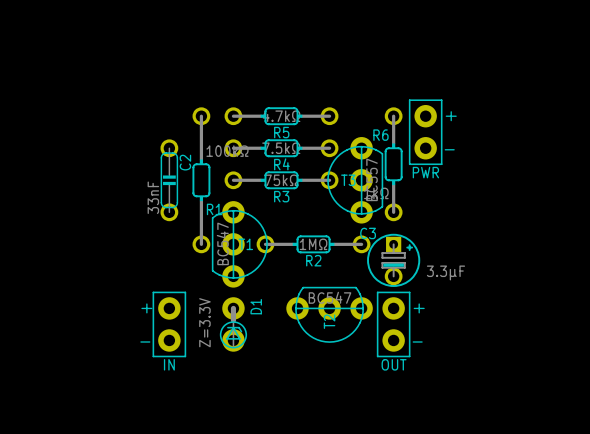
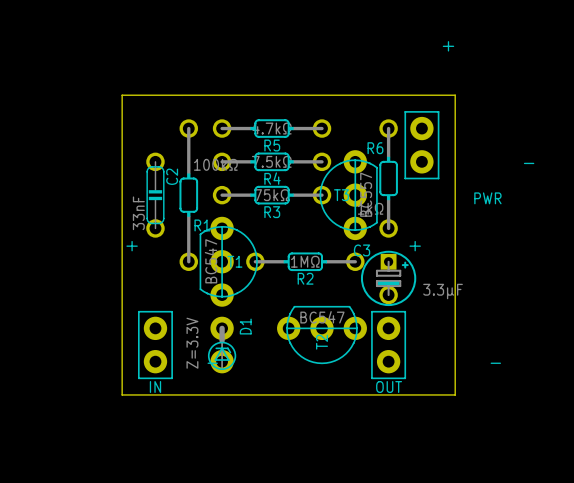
board edge: none -> (122, 95) (455, 95) (455, 394) (122, 394) (122, 95)
part footprint: [408, 99, 443, 166] -> [404, 111, 440, 180]
IN footprint: [152, 291, 187, 358] -> [137, 310, 173, 380]
OUT footprint: [376, 291, 411, 358] -> [371, 310, 407, 380]

